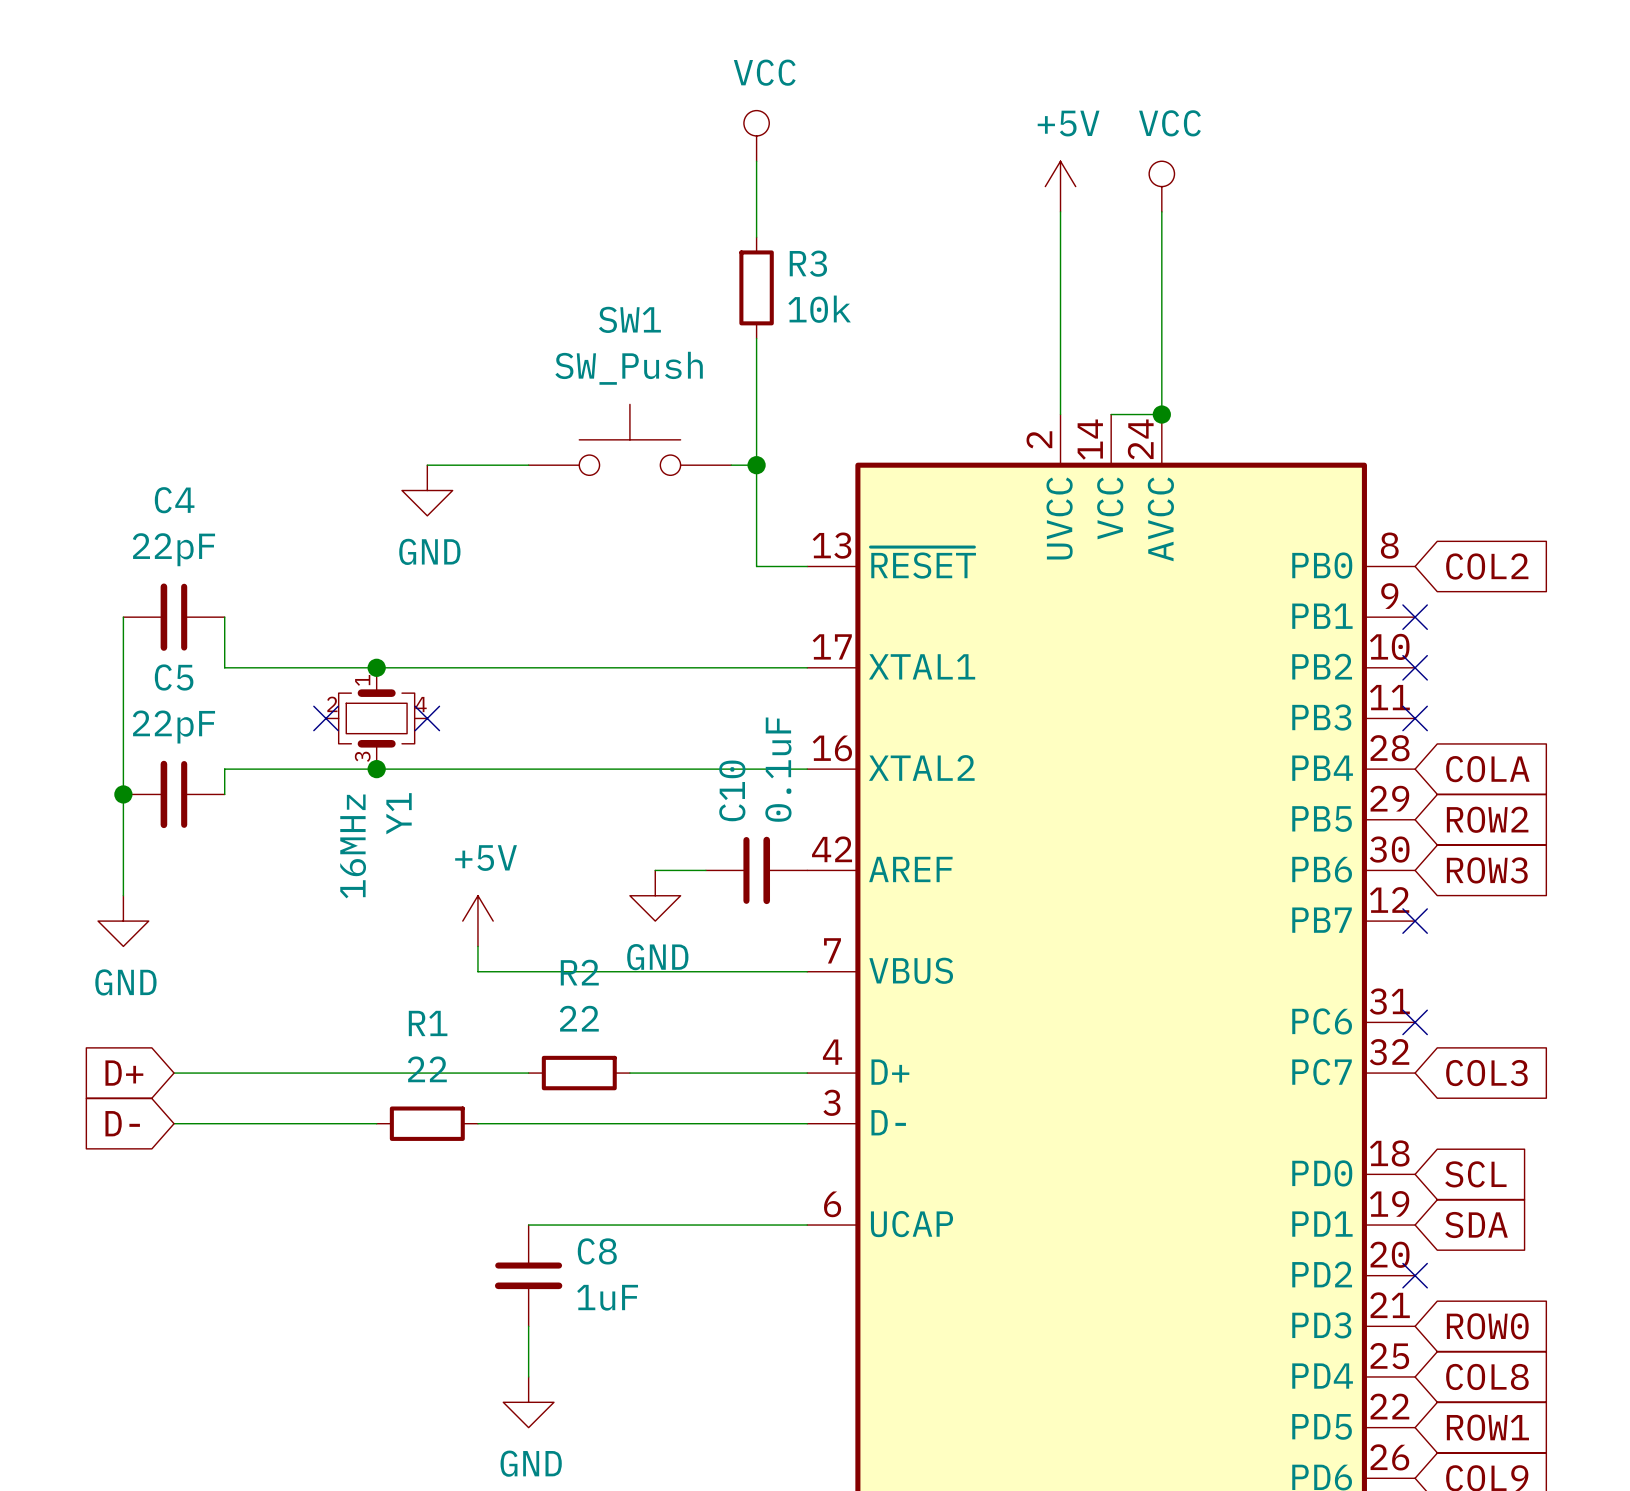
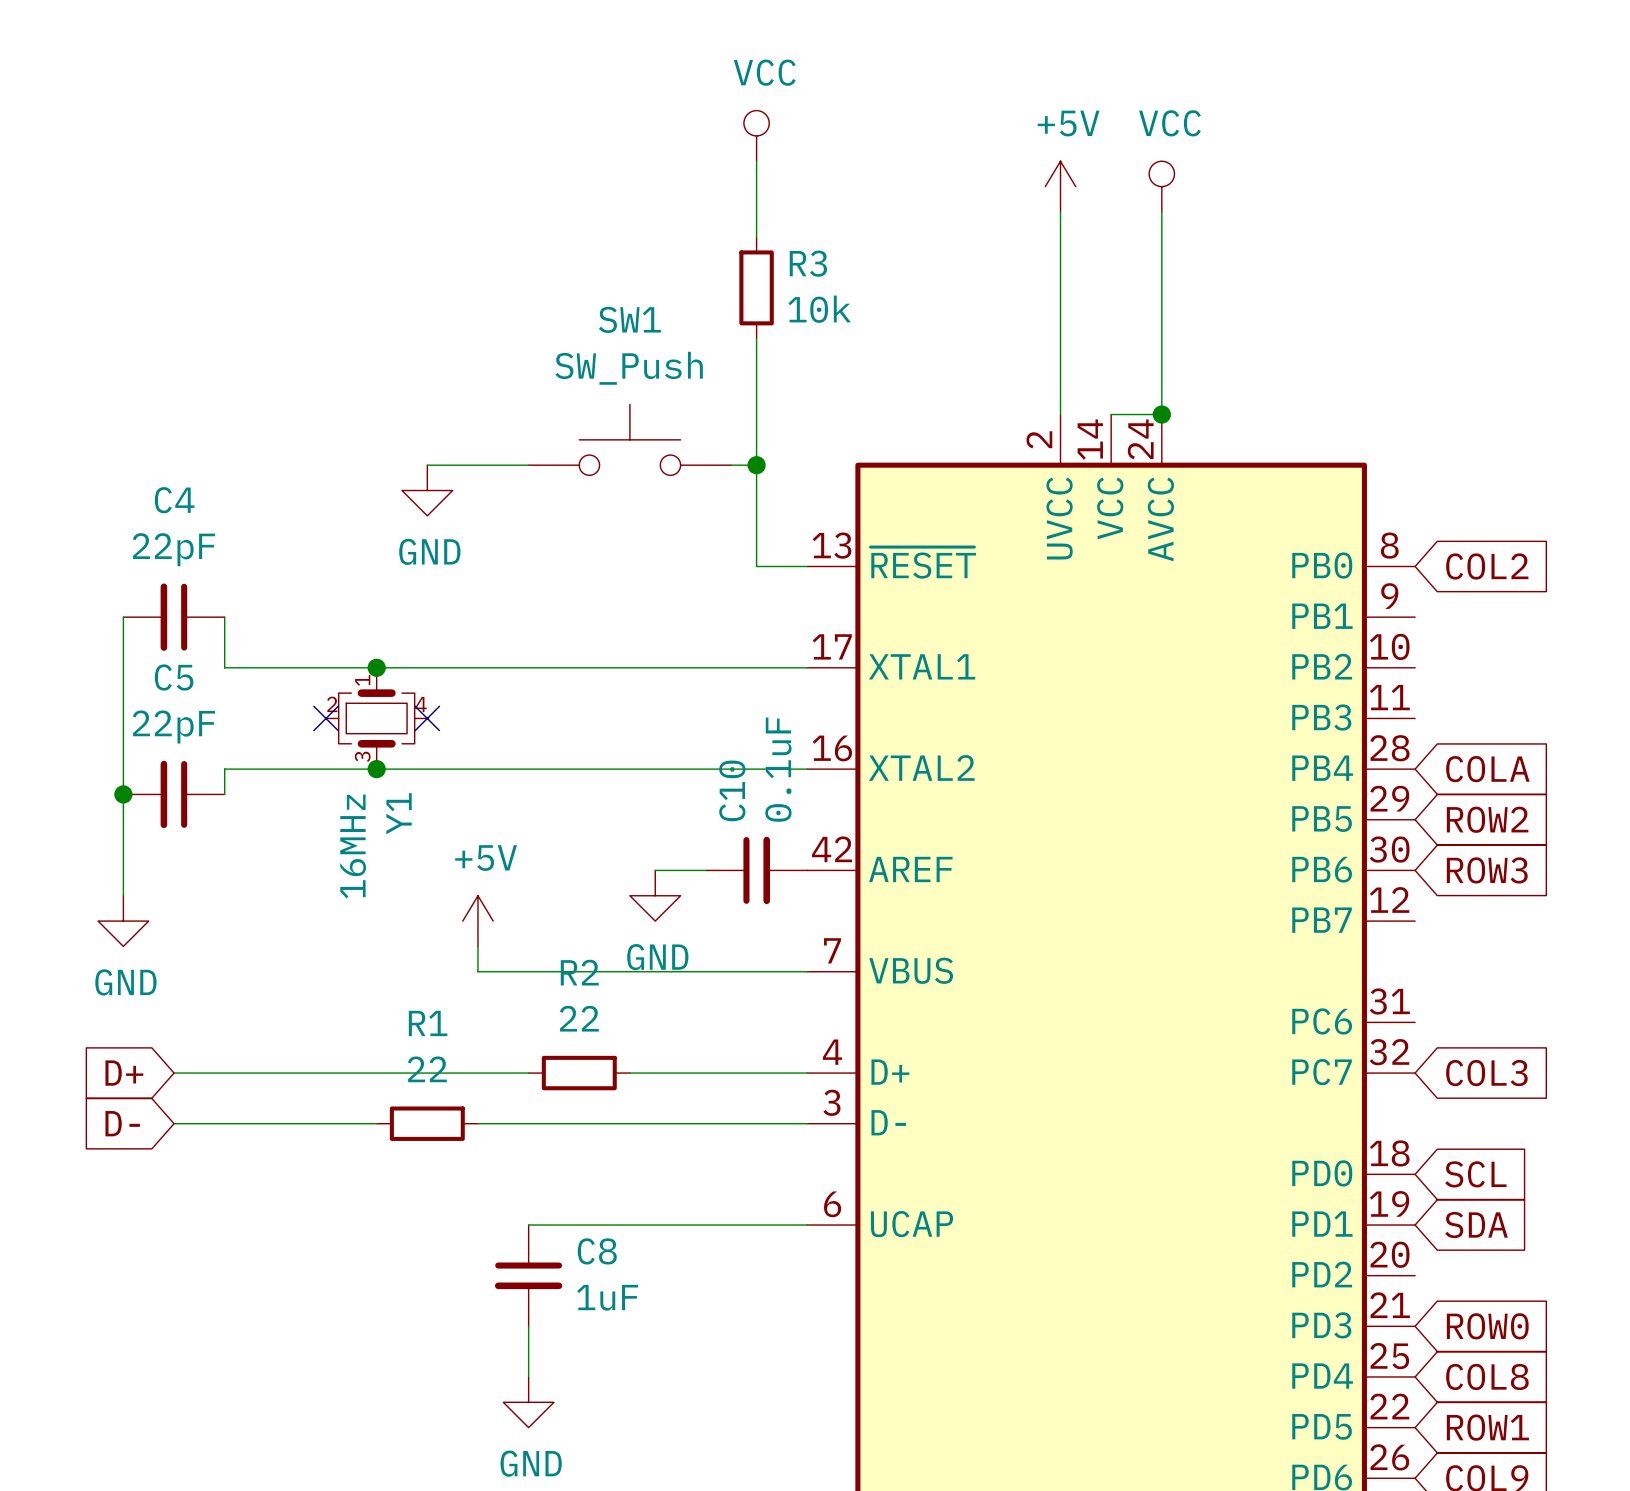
no-connect mark: (1415, 617) -> none
no-connect mark: (1415, 667) -> none
no-connect mark: (1415, 718) -> none
no-connect mark: (1415, 921) -> none
no-connect mark: (1415, 1022) -> none
no-connect mark: (1415, 1275) -> none

